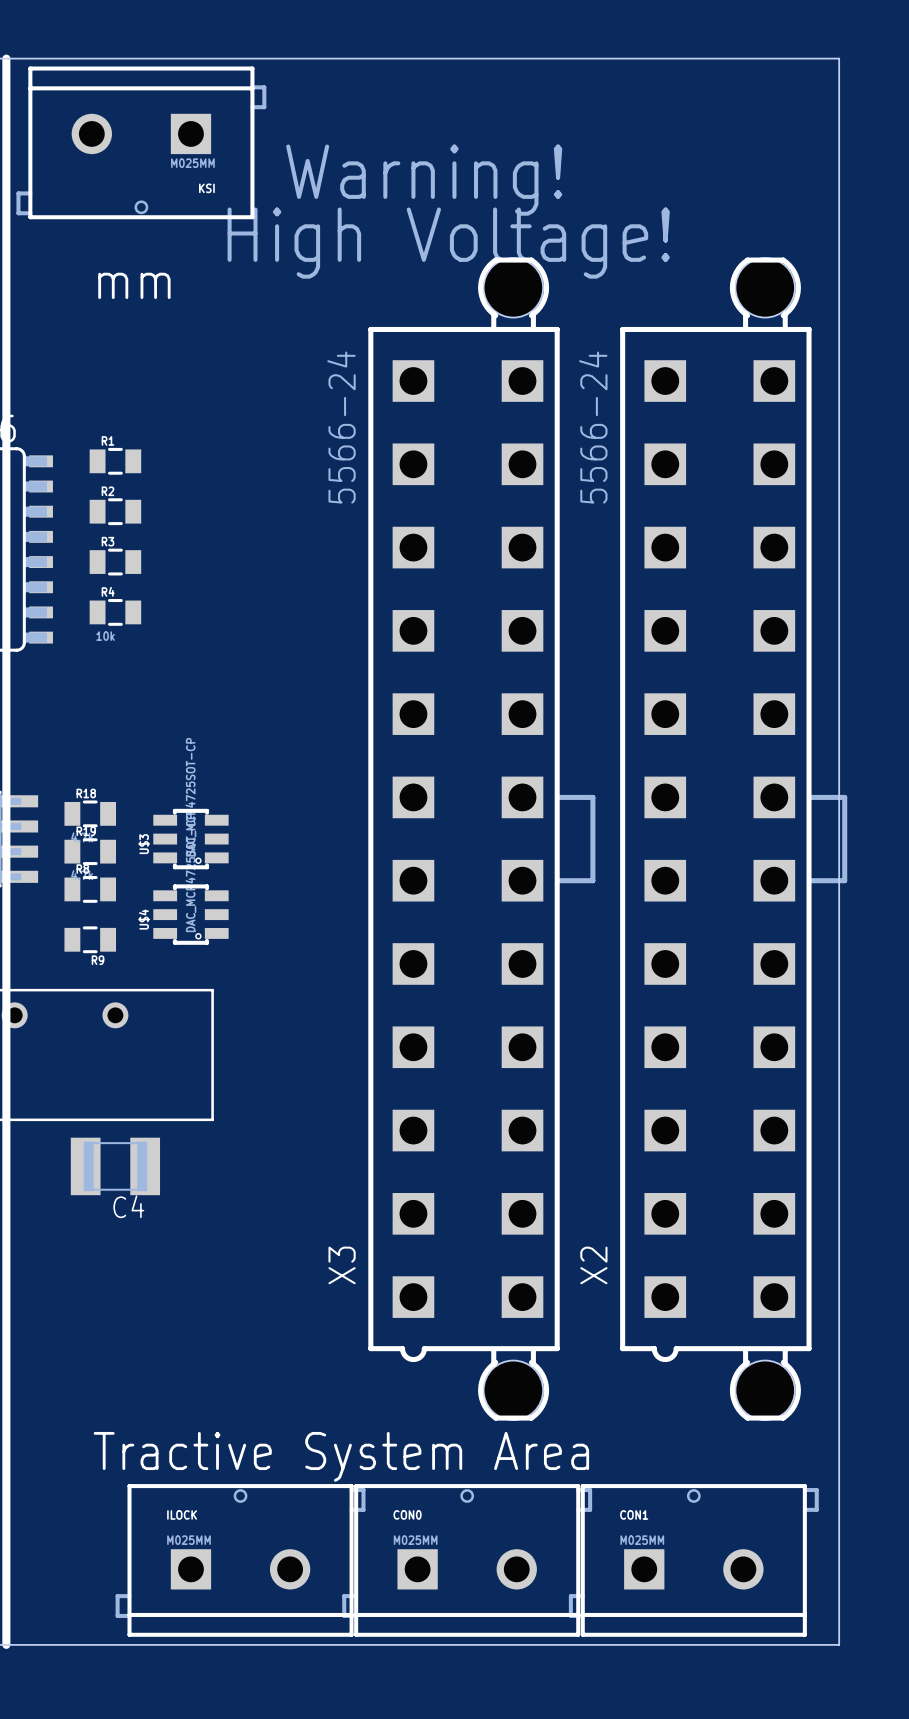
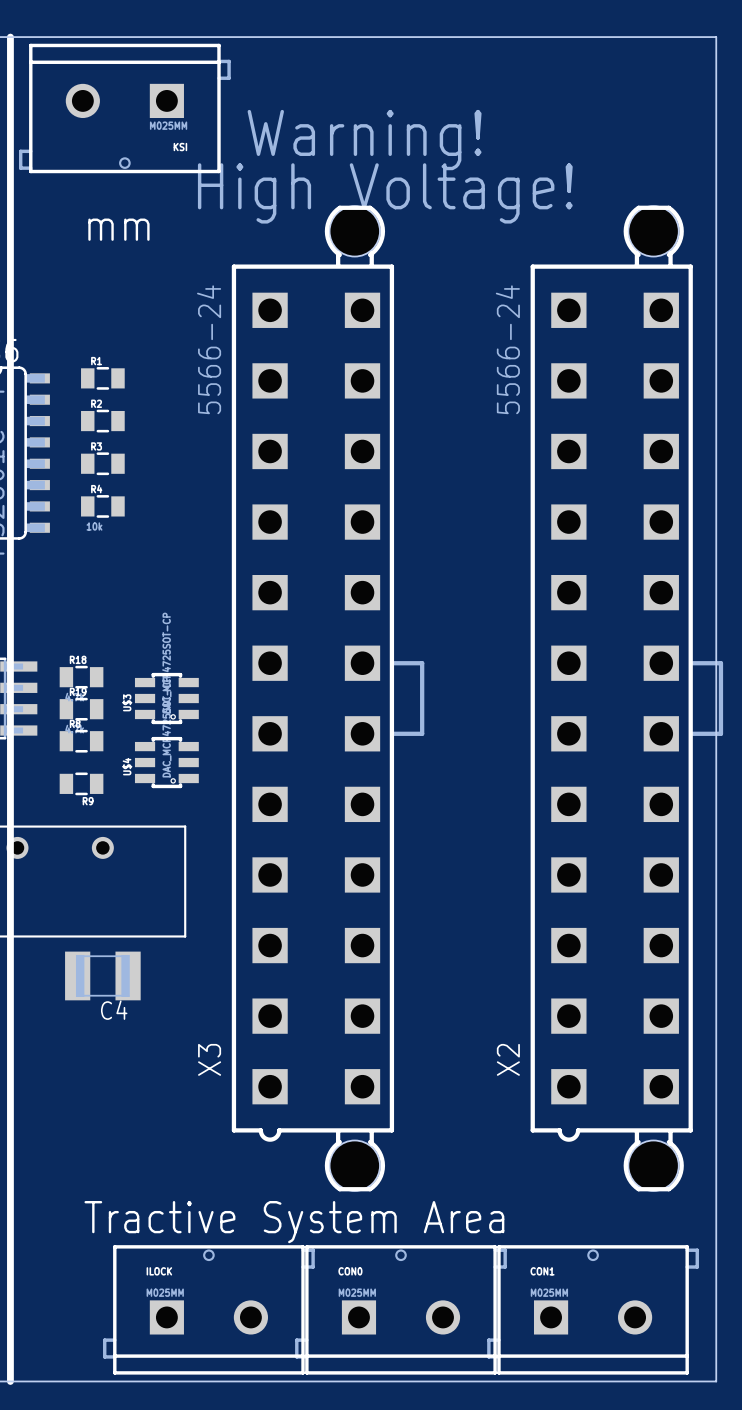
X3 position: (481, 839) -> (328, 698)

